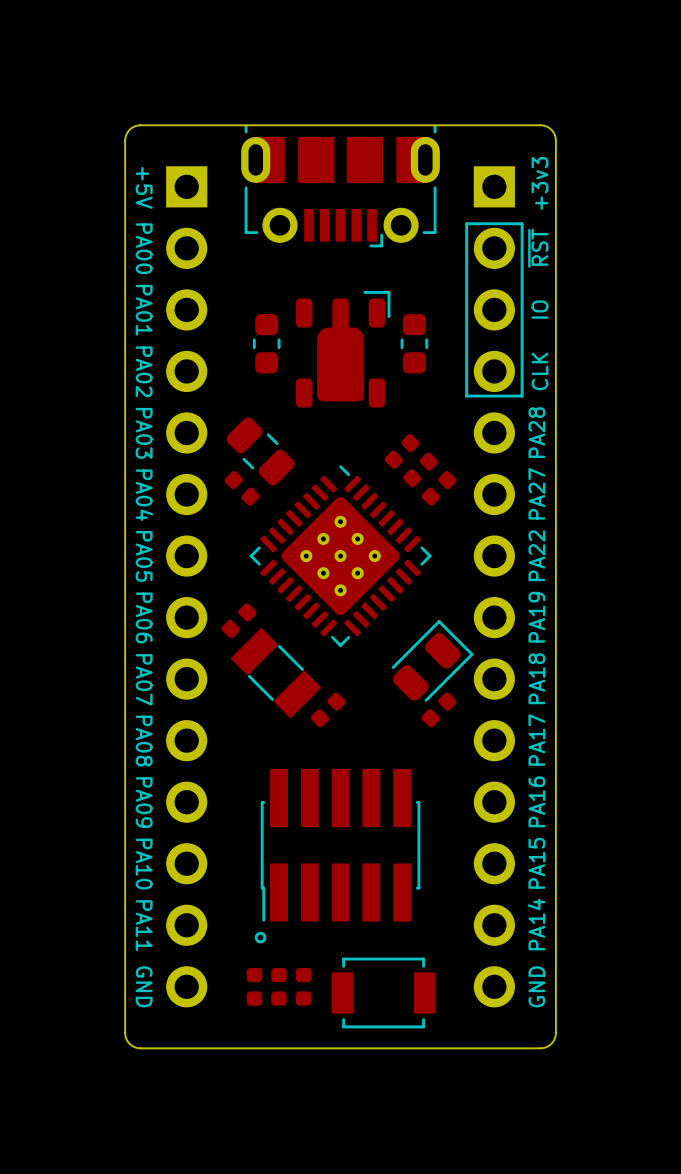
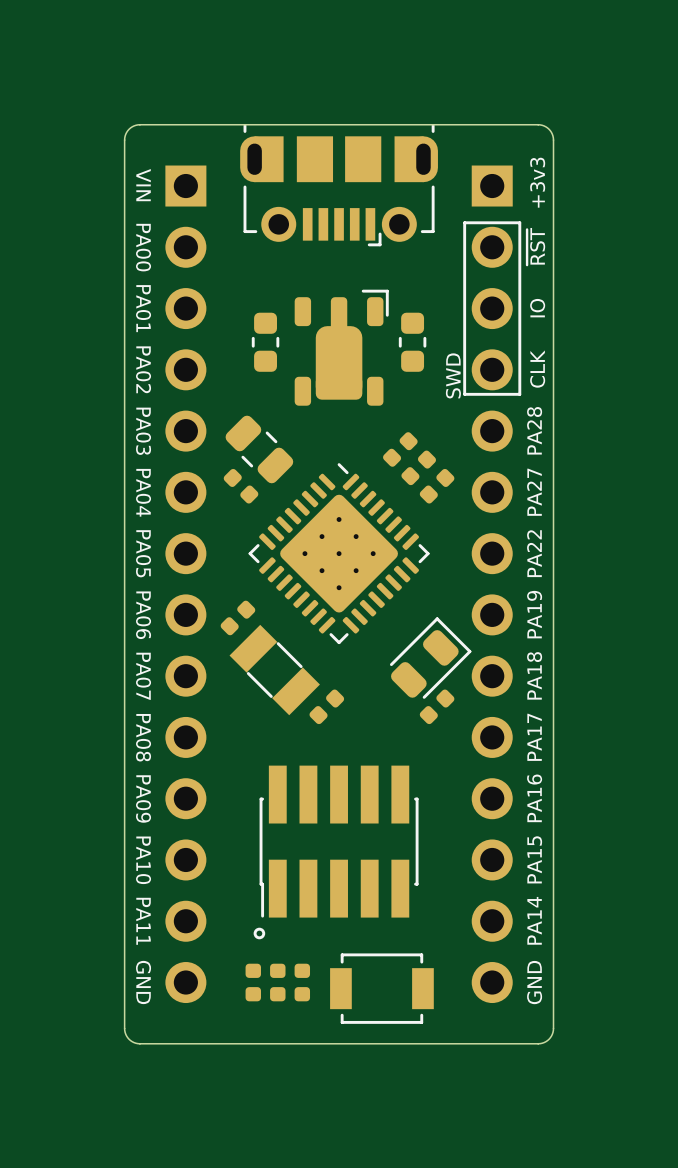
text: +5V (144, 187) -> VIN (143, 185)
text: none -> SWD (453, 375)

